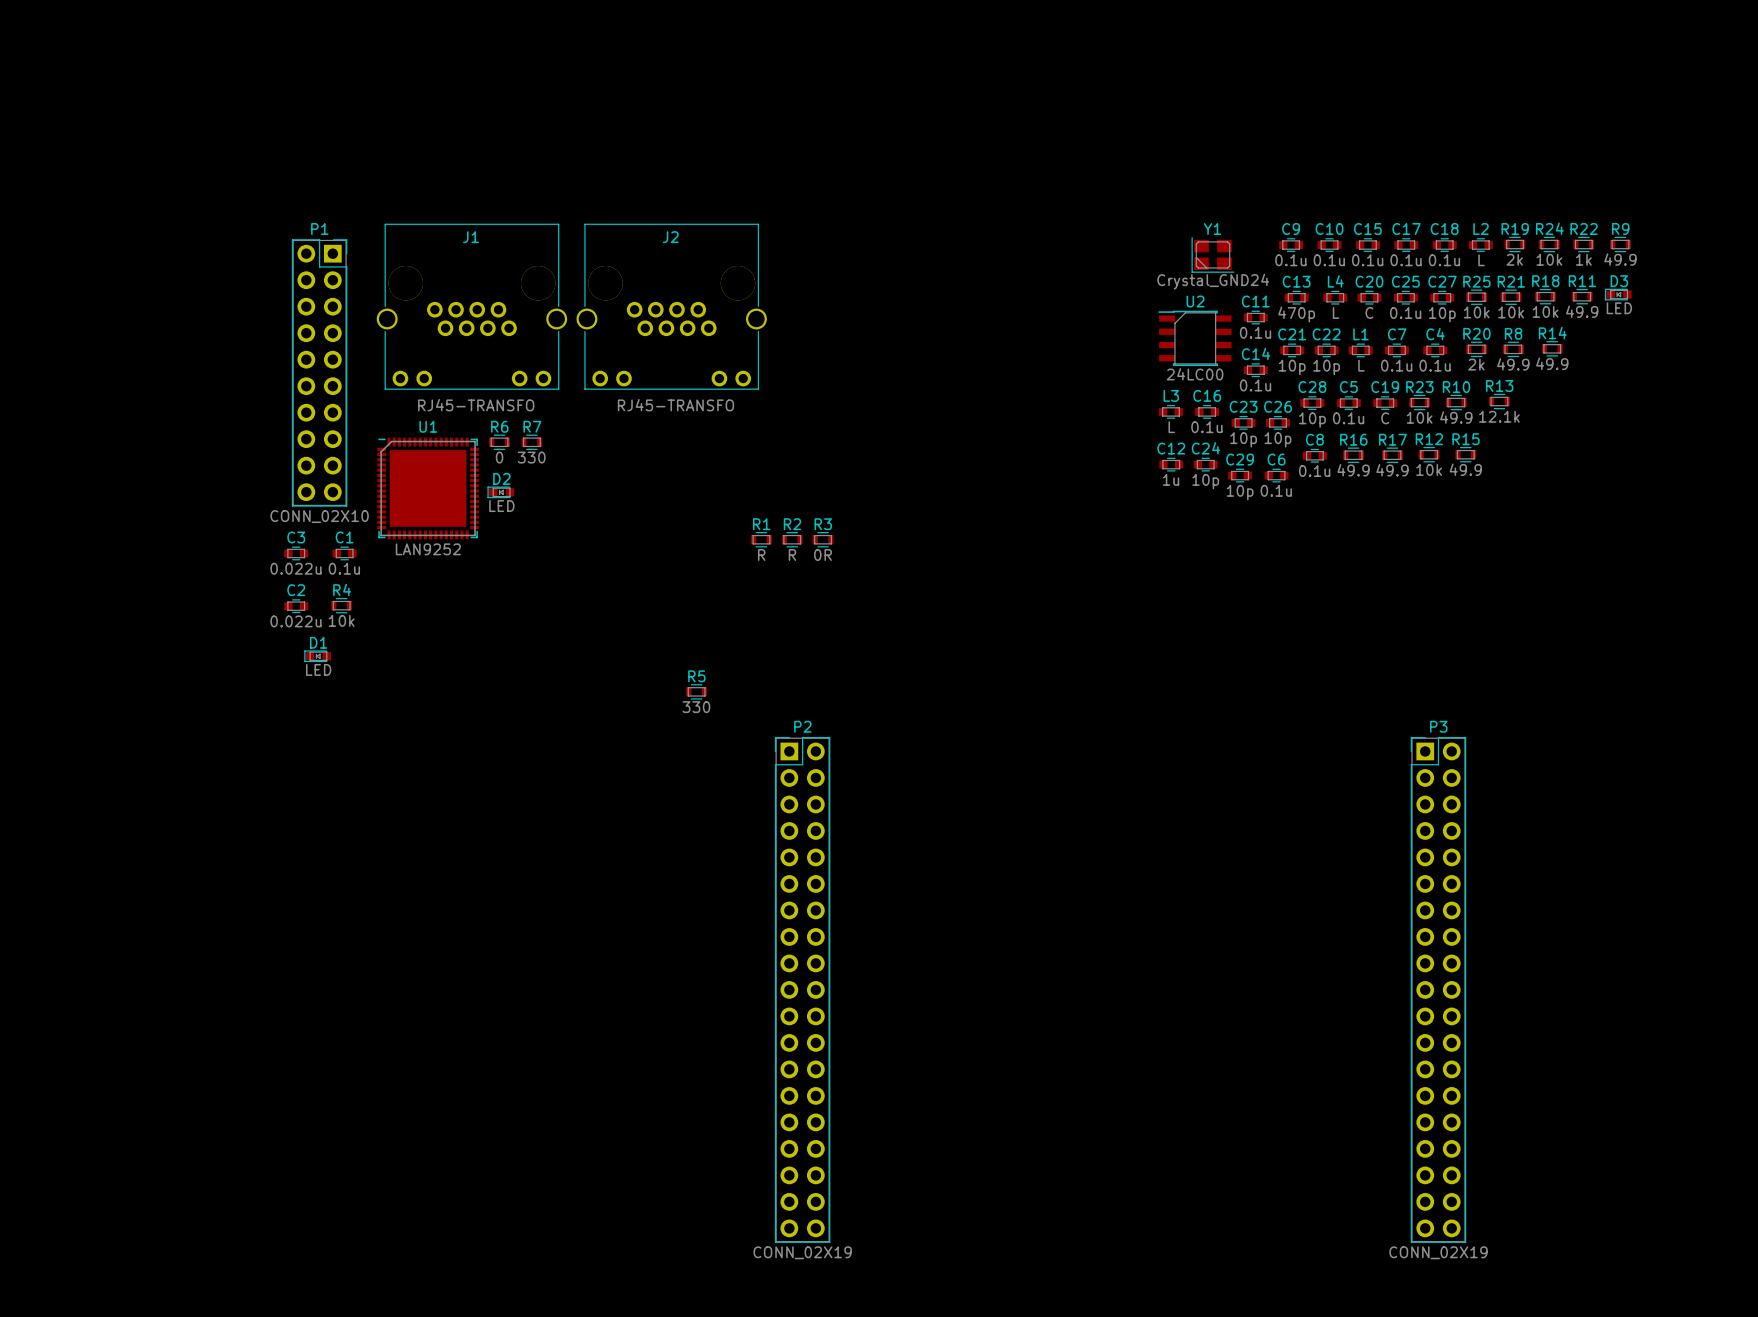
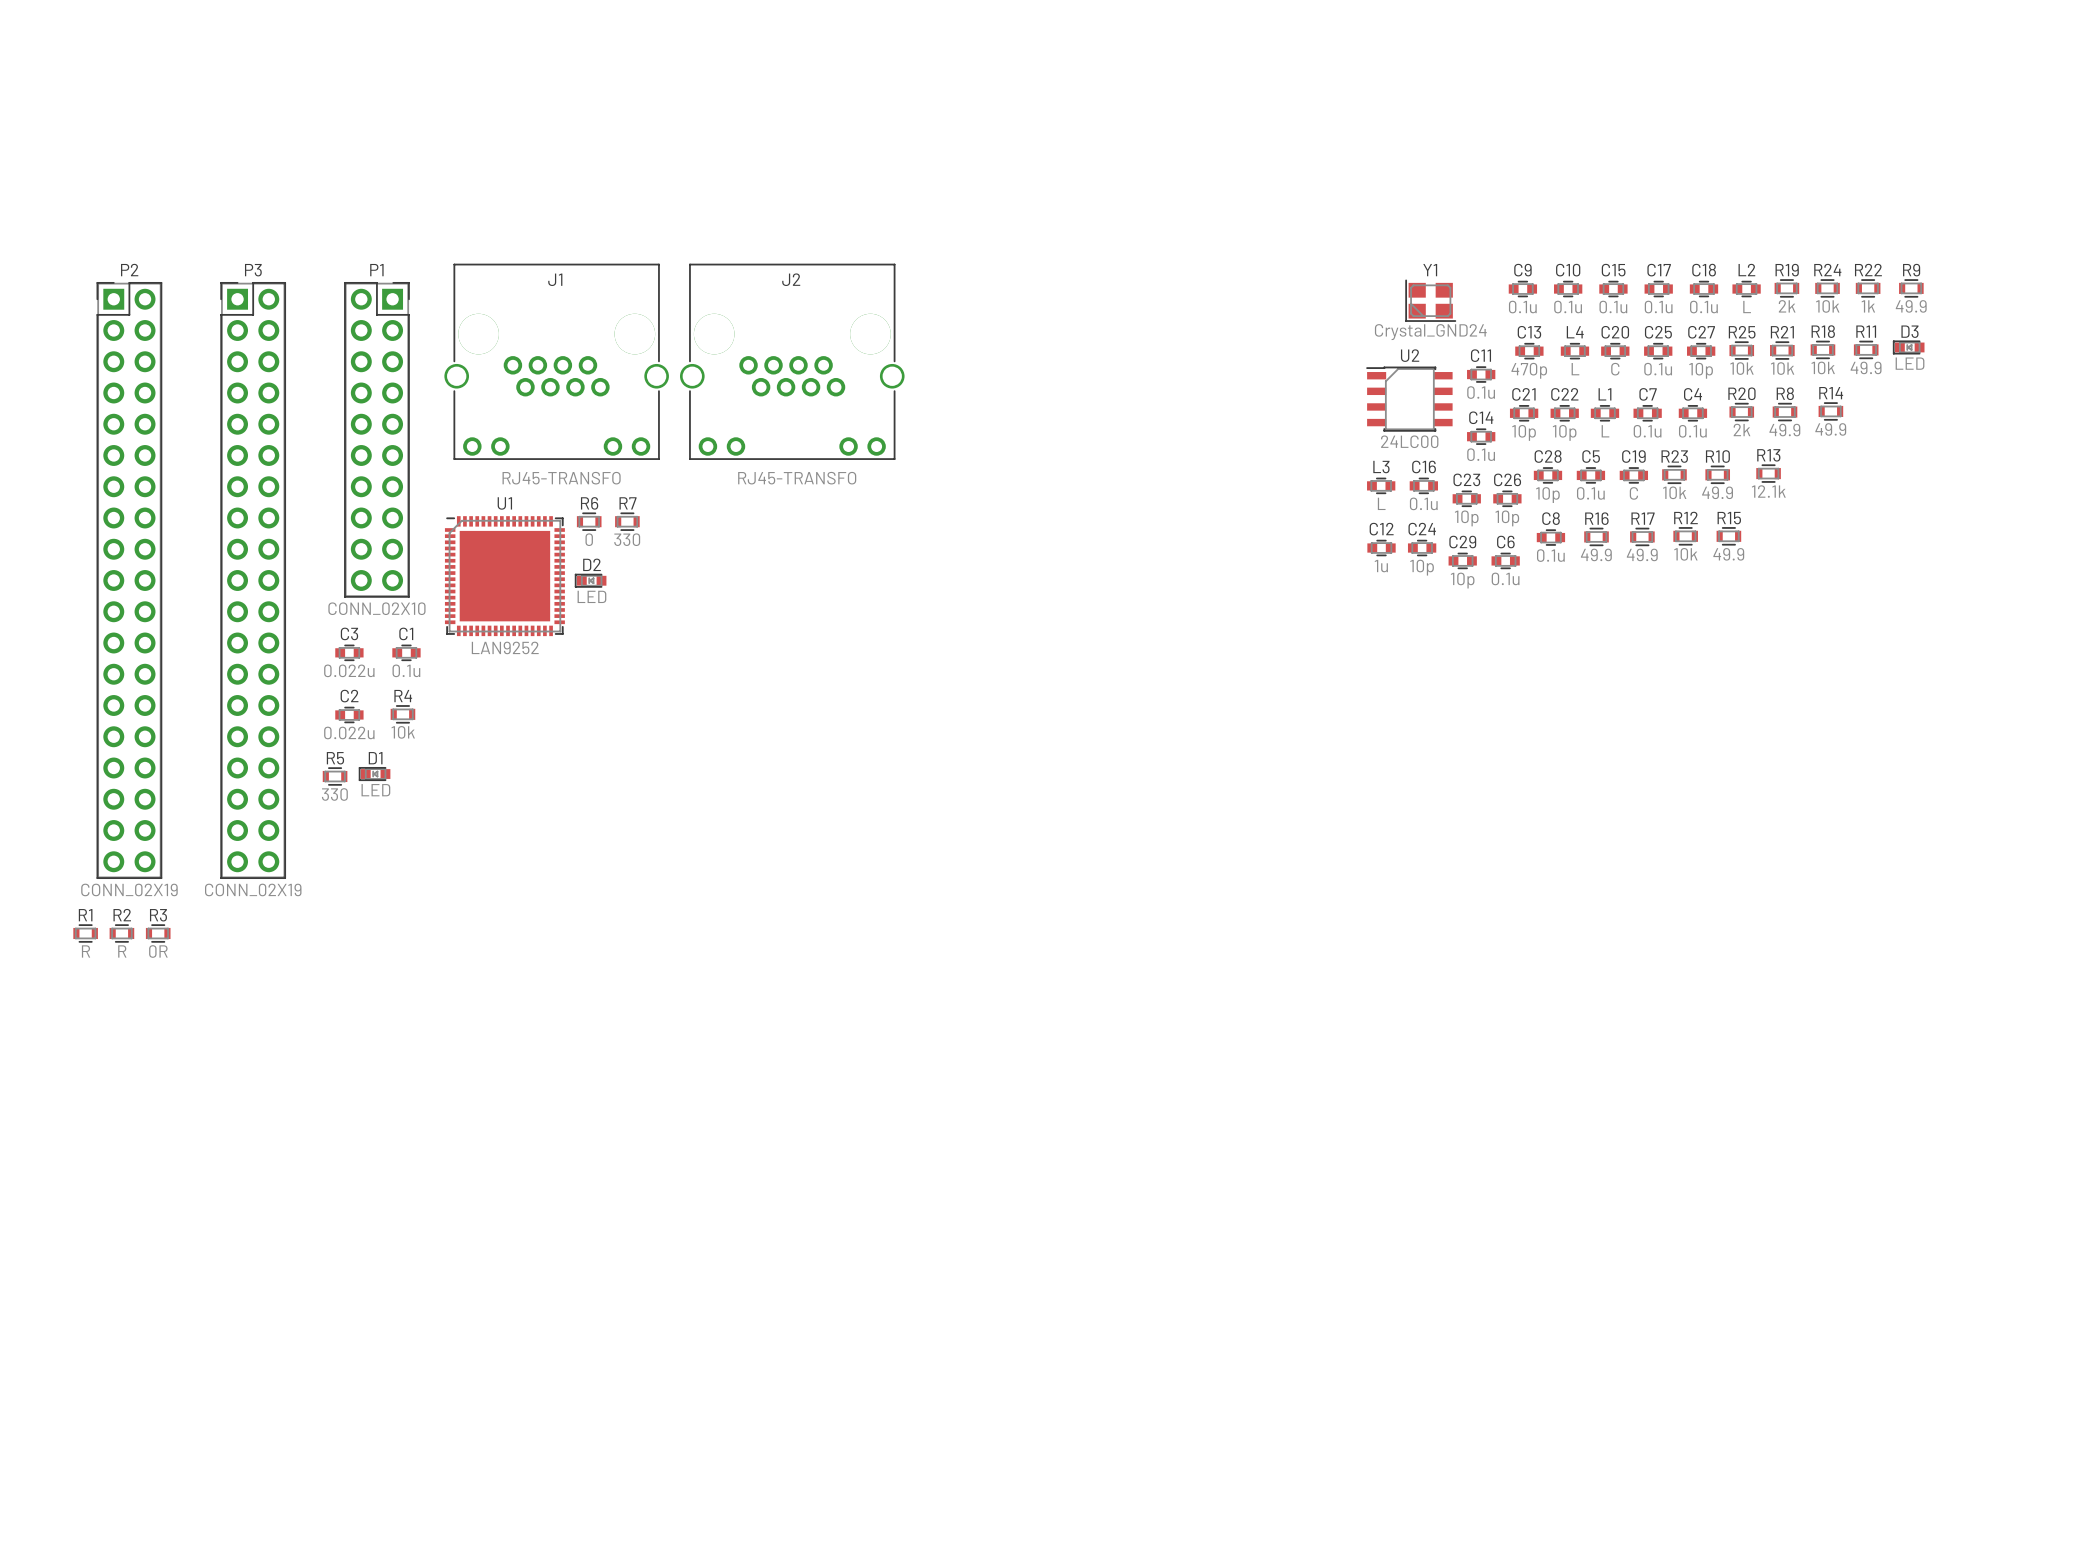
R1 position: (761, 539) -> (85, 933)
R2 position: (792, 539) -> (121, 933)
R3 position: (823, 539) -> (158, 933)
R5 position: (696, 691) -> (335, 776)
P2 position: (802, 989) -> (129, 580)
P3 position: (1438, 989) -> (253, 580)

